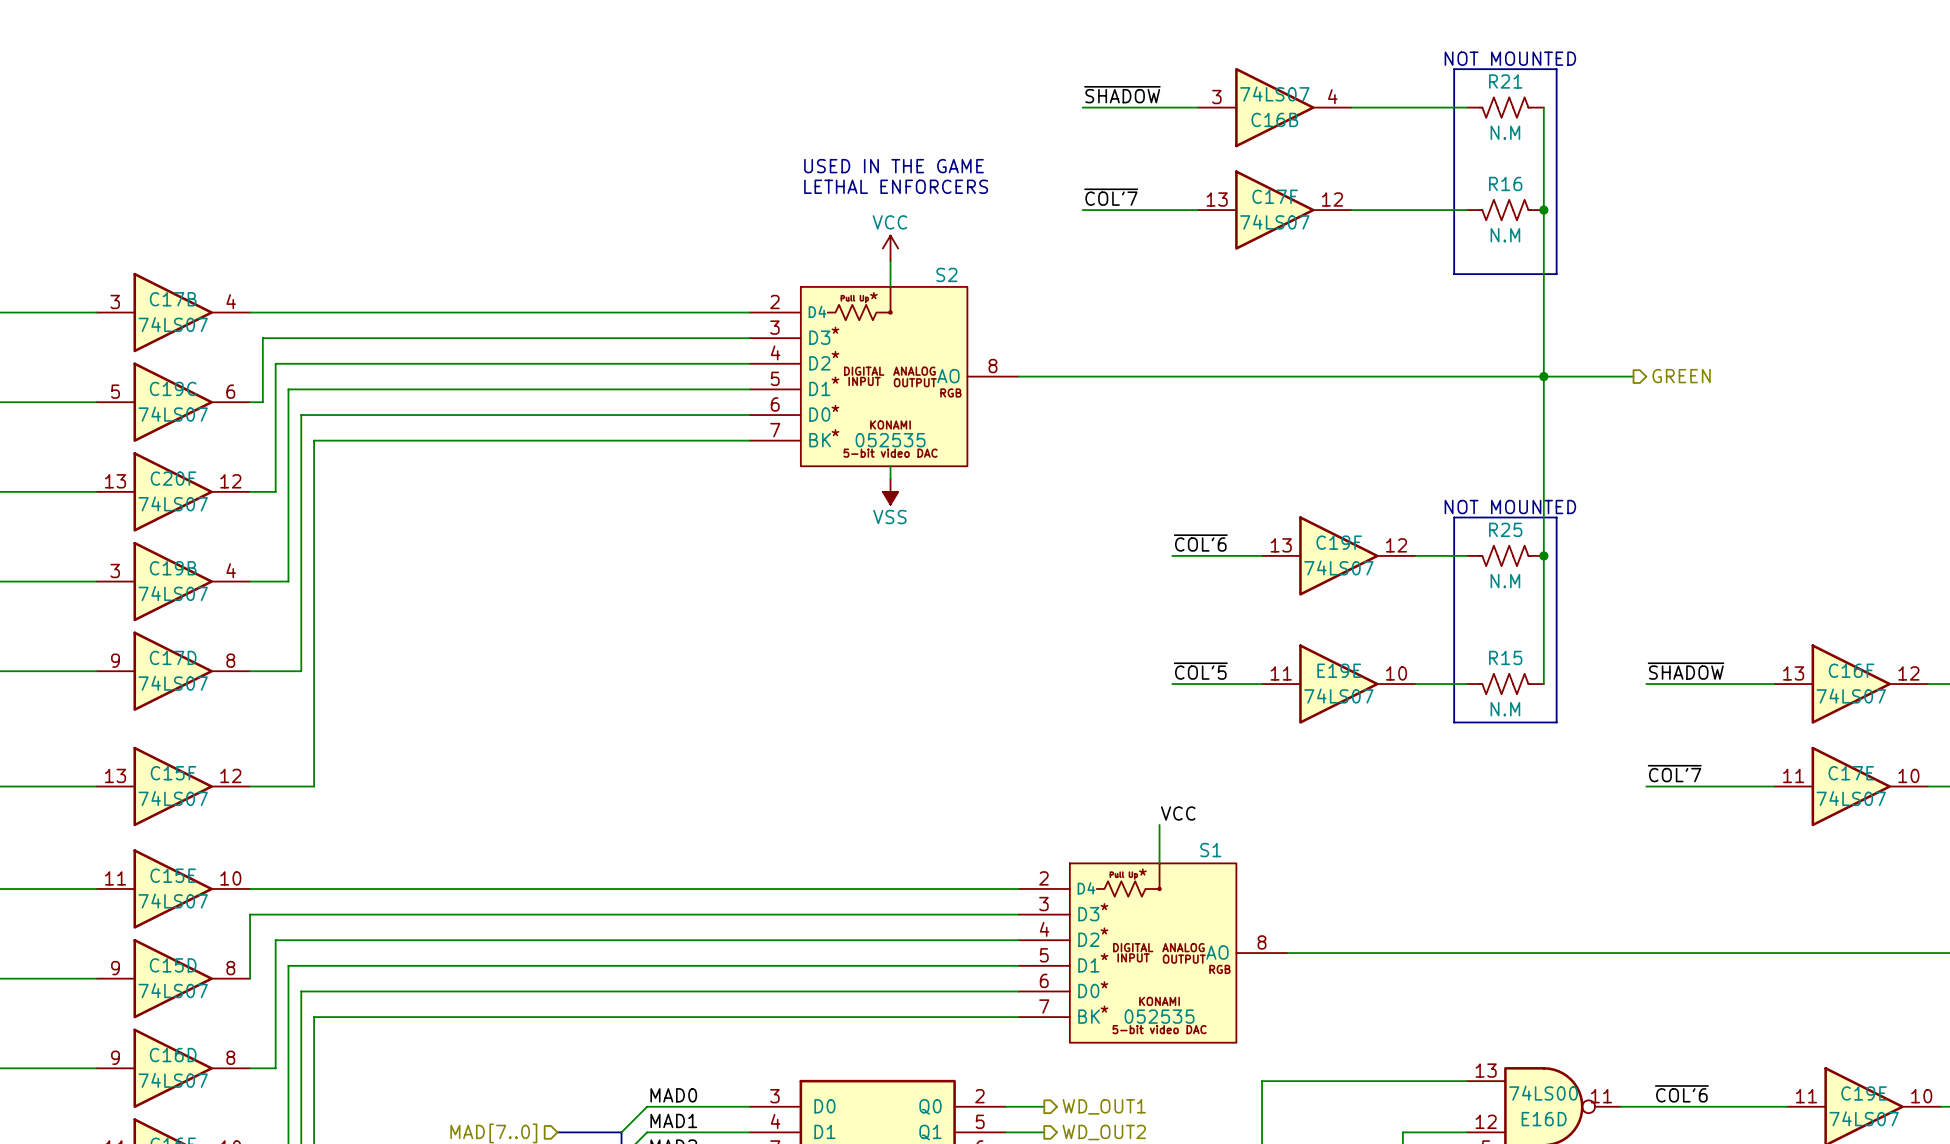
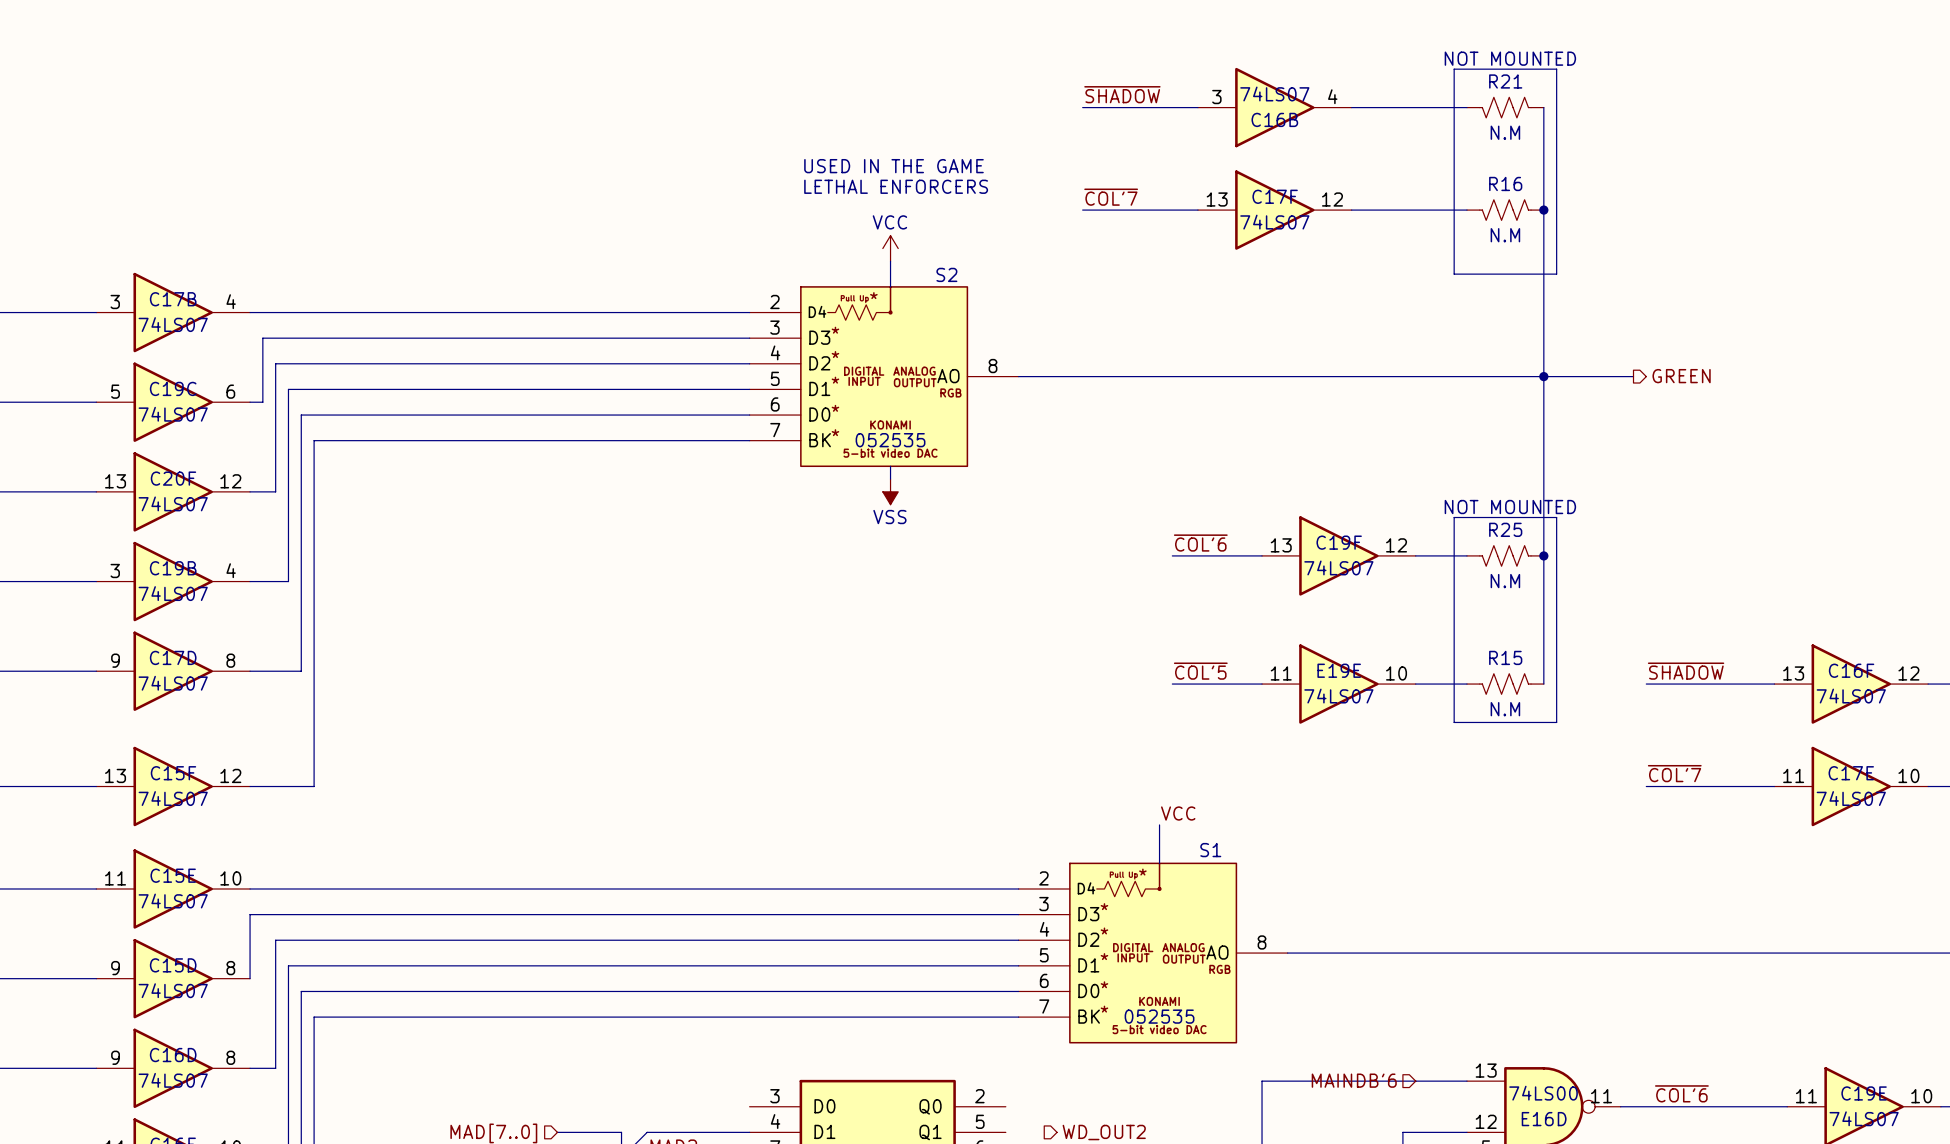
hierarchical label: none -> MAINDB'6 (1354, 1080)
label: MAD0 (673, 1095) -> none
wire: (749, 1106) (647, 1106) (621, 1132) -> none
wire: (1005, 1106) (1044, 1106) -> none
hierarchical label: WD_OUT1 (1104, 1106) -> none
label: MAD1 (673, 1120) -> none
wire: (1005, 1132) (1044, 1132) -> none

